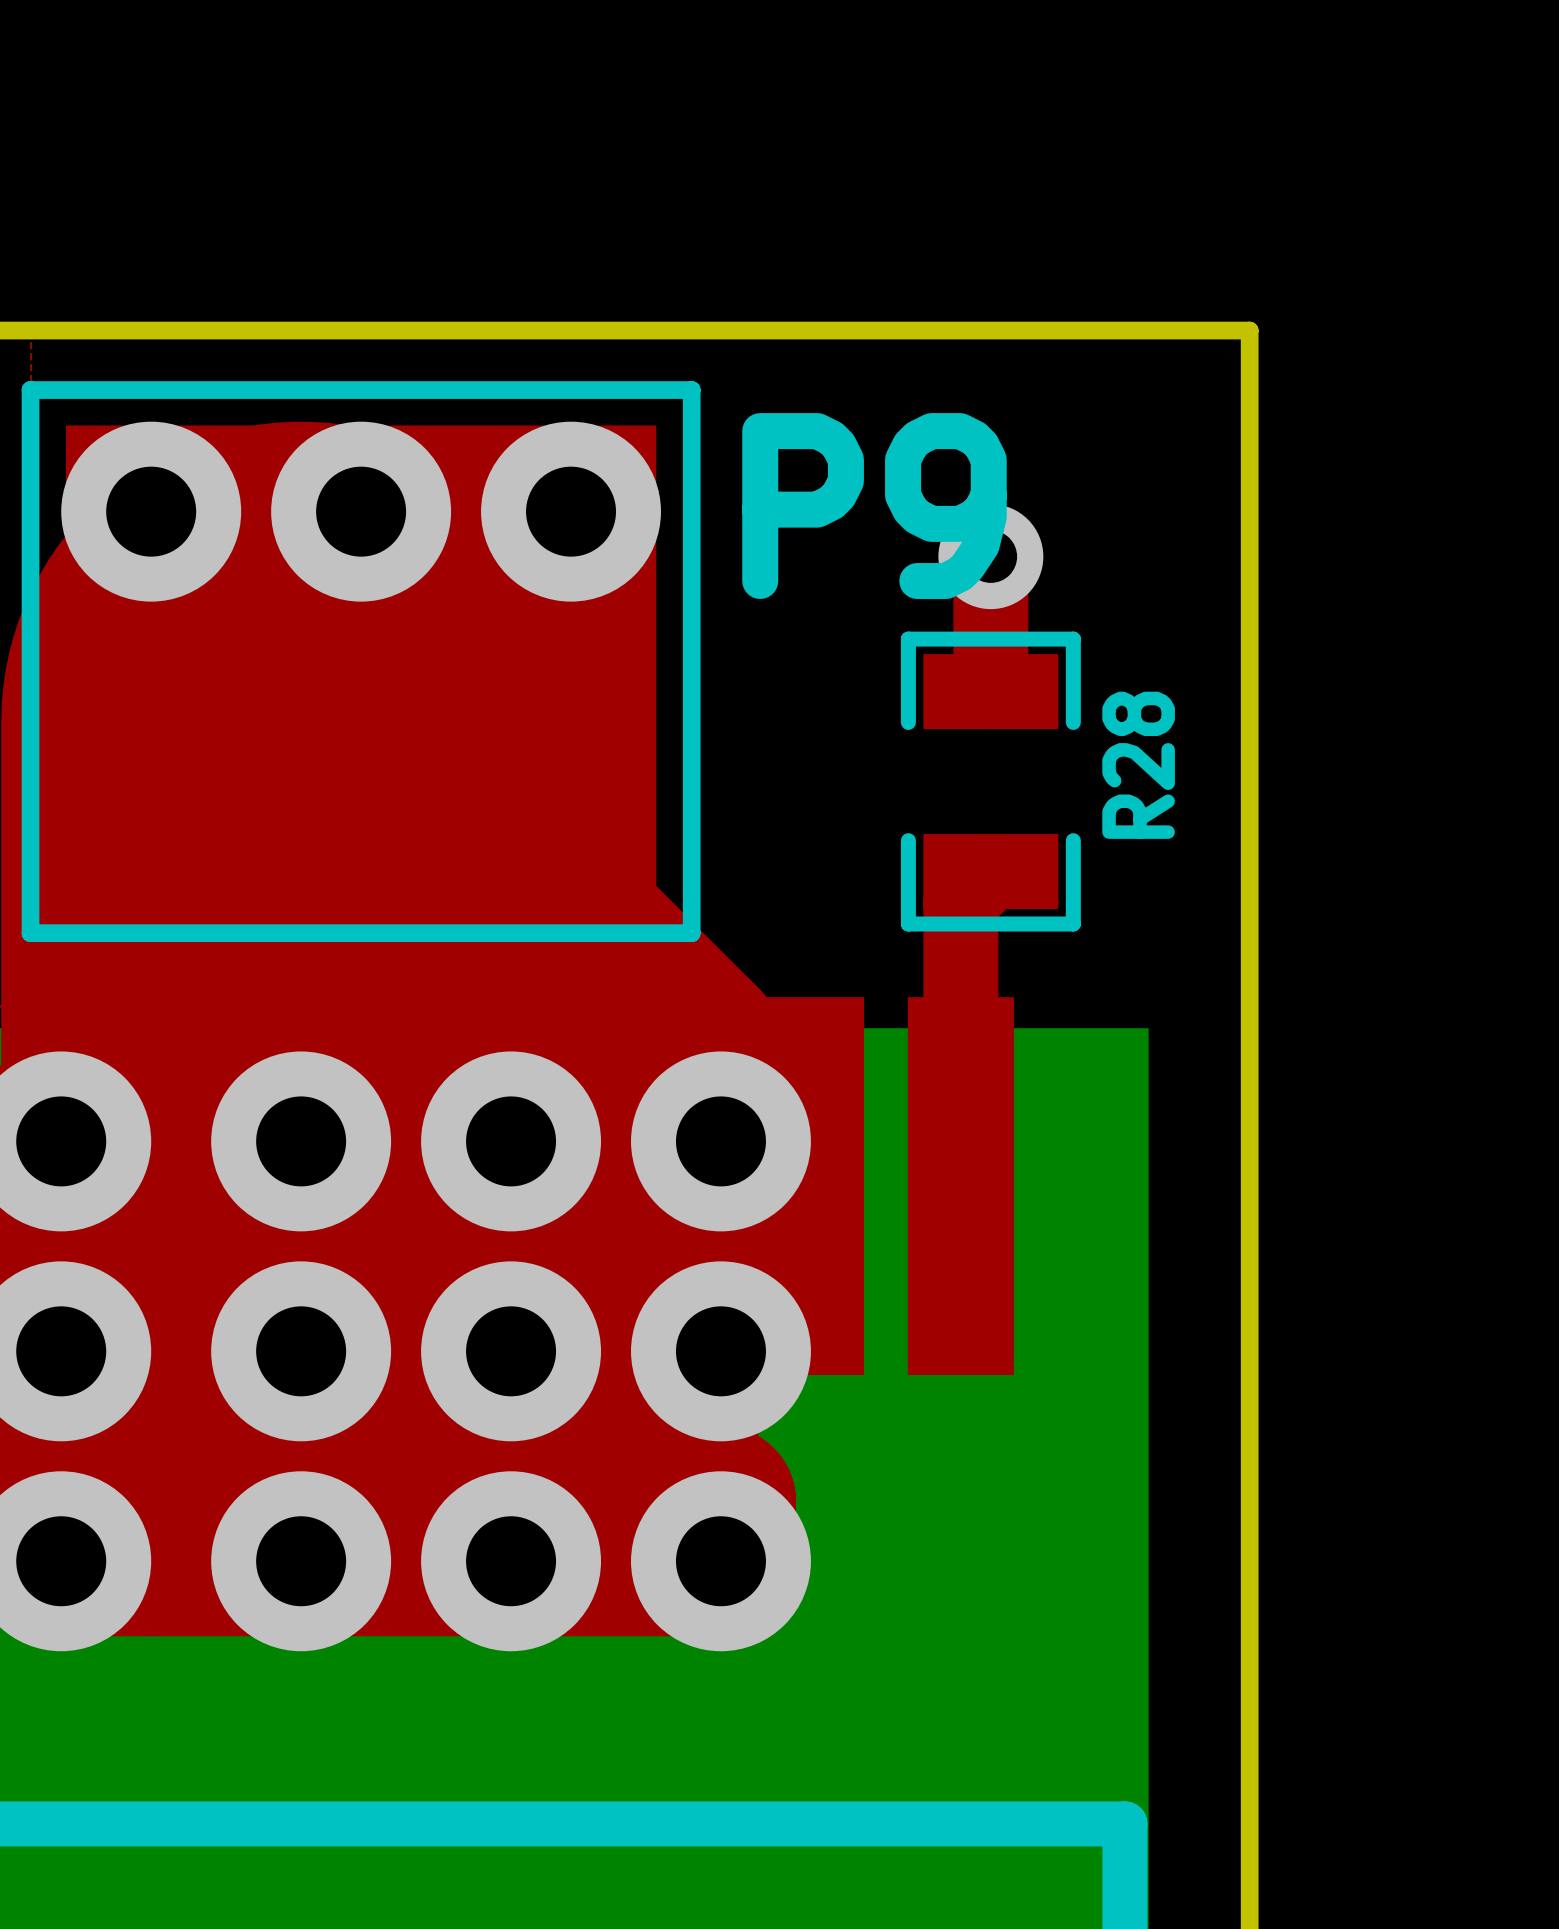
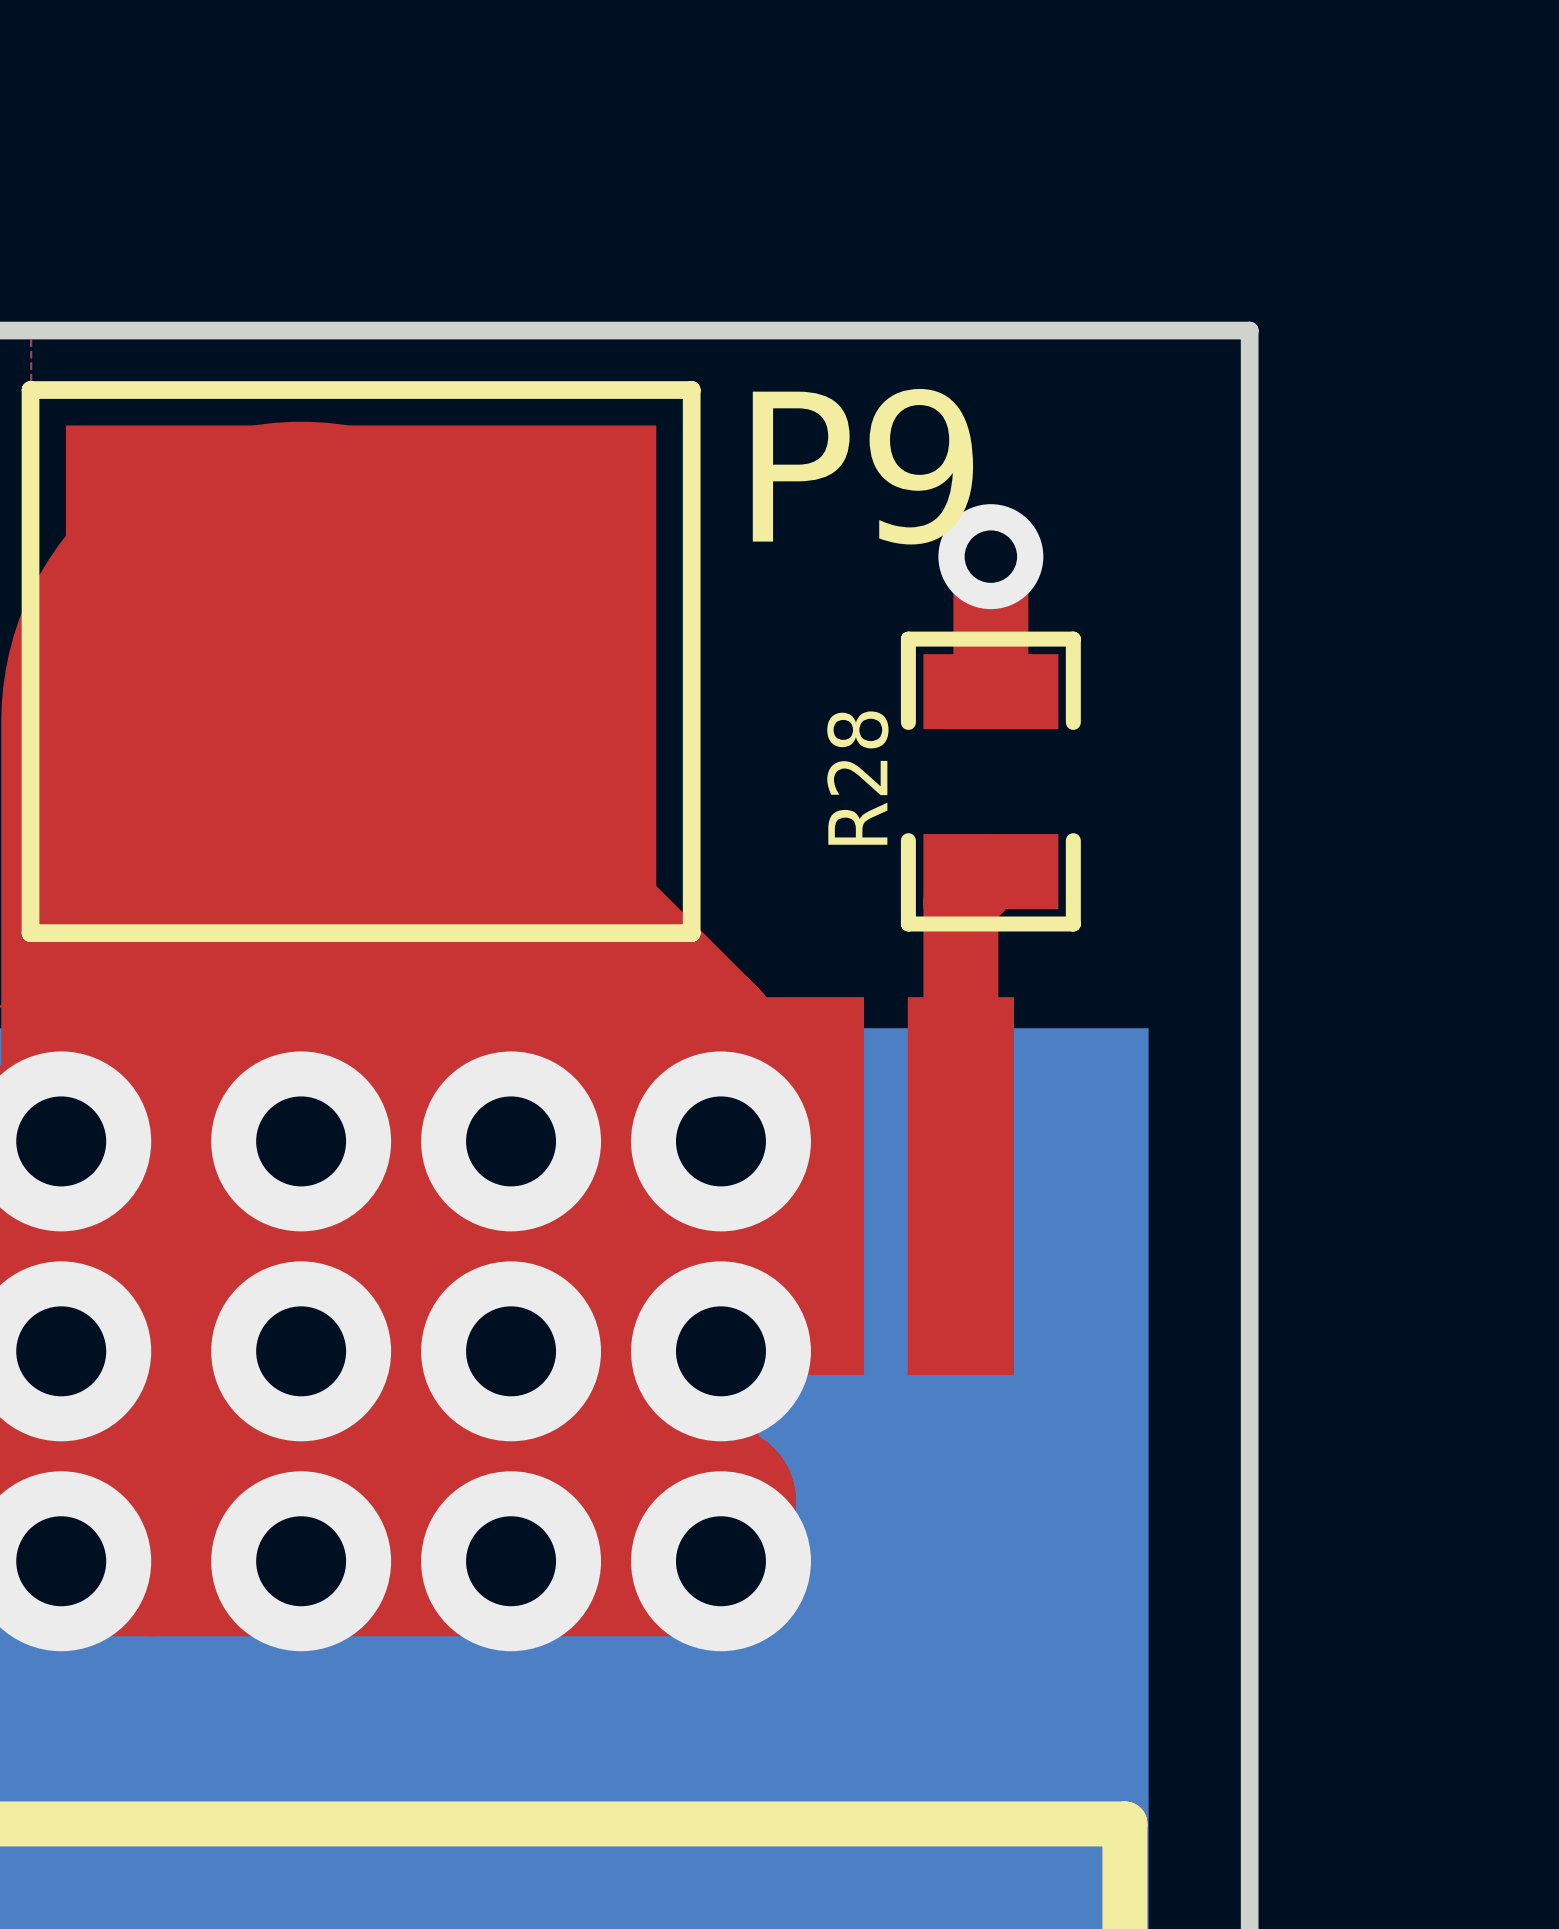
P9 name position: P9 (874, 506) -> P9 (862, 466)
via: (151, 511) -> none
via: (361, 511) -> none
via: (571, 511) -> none
R28 name position: R28 (1138, 765) -> R28 (857, 778)

